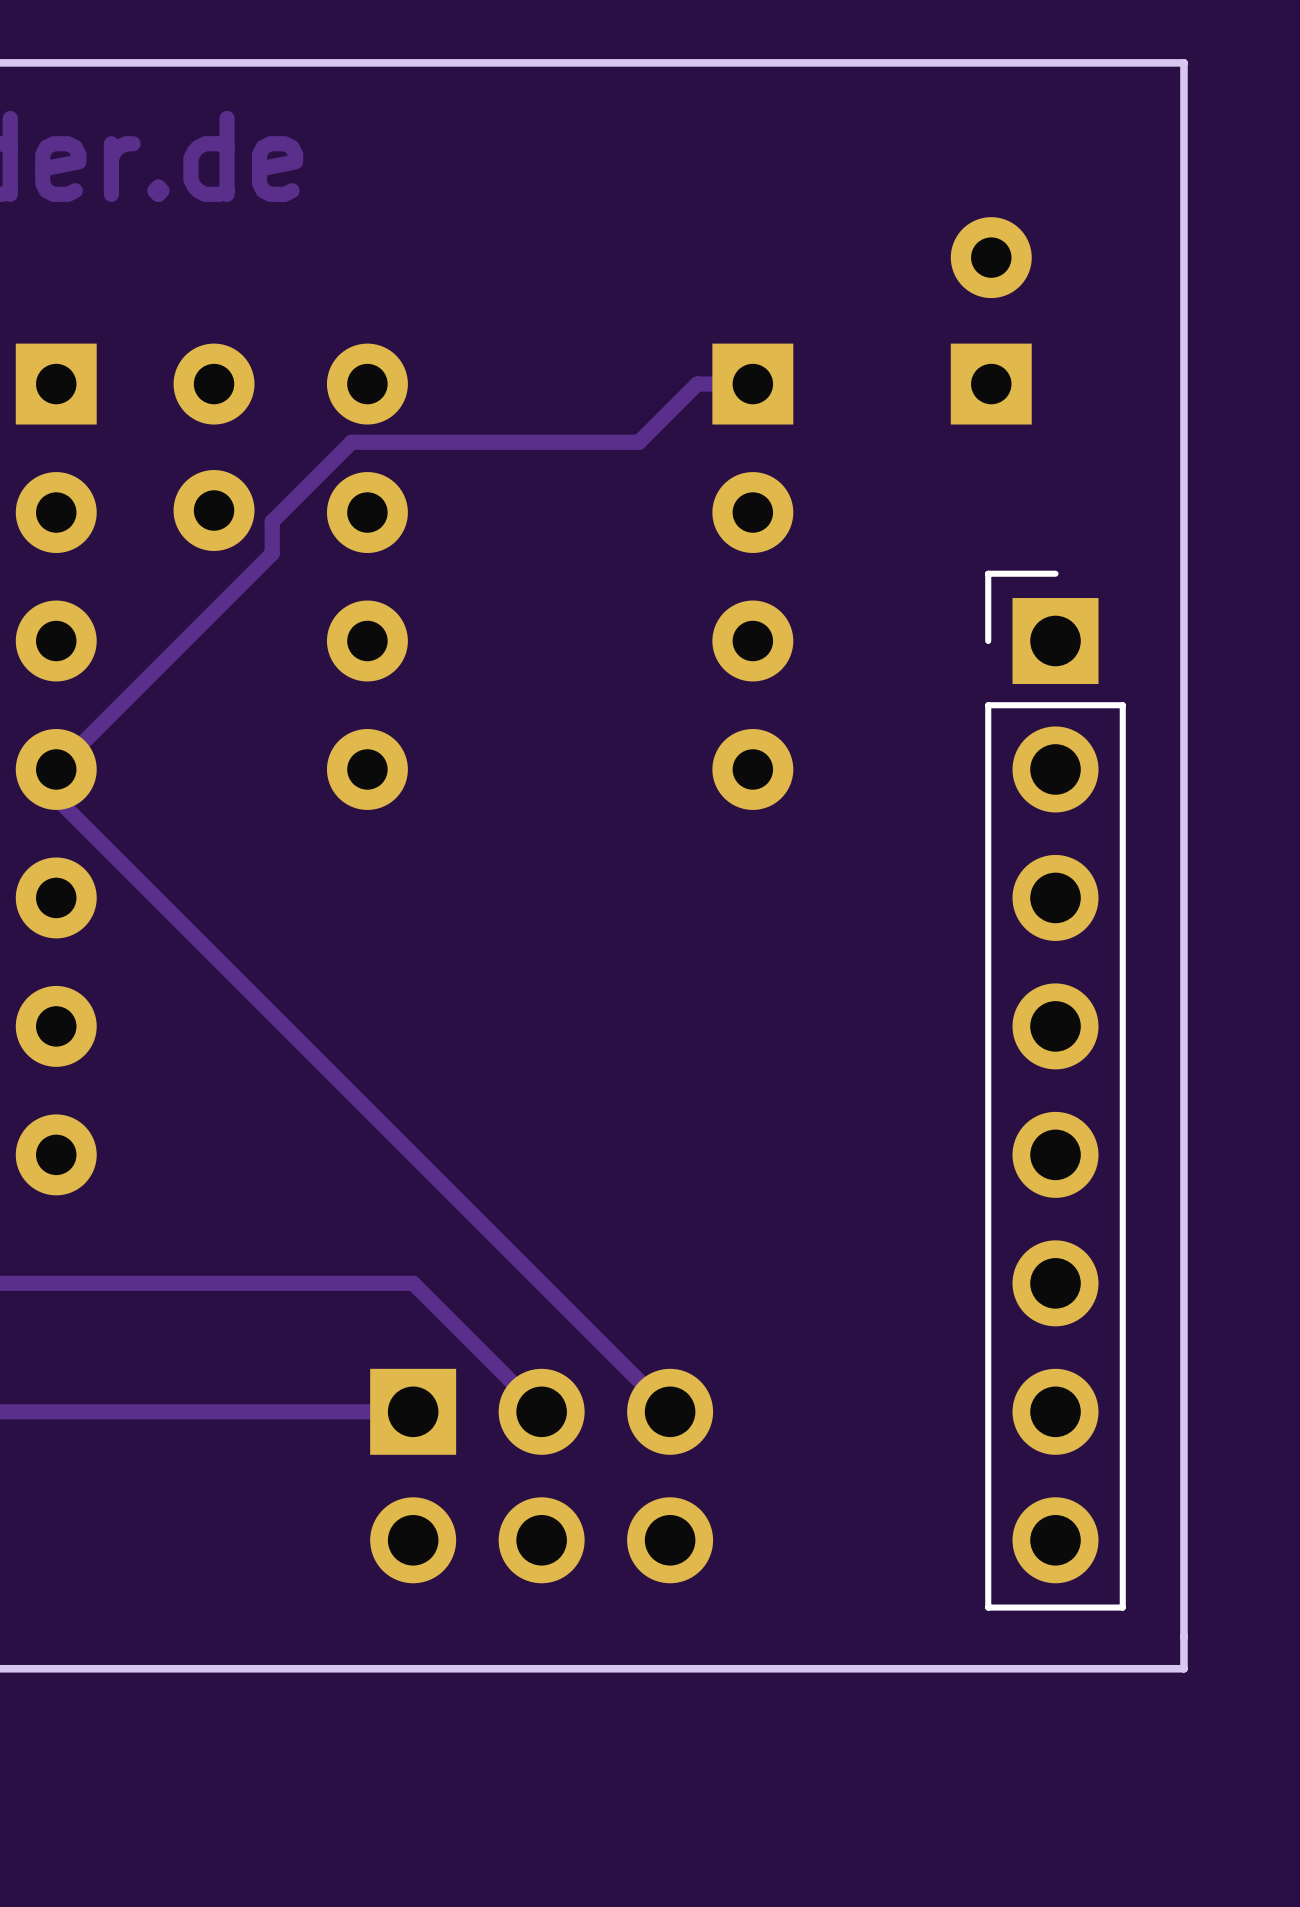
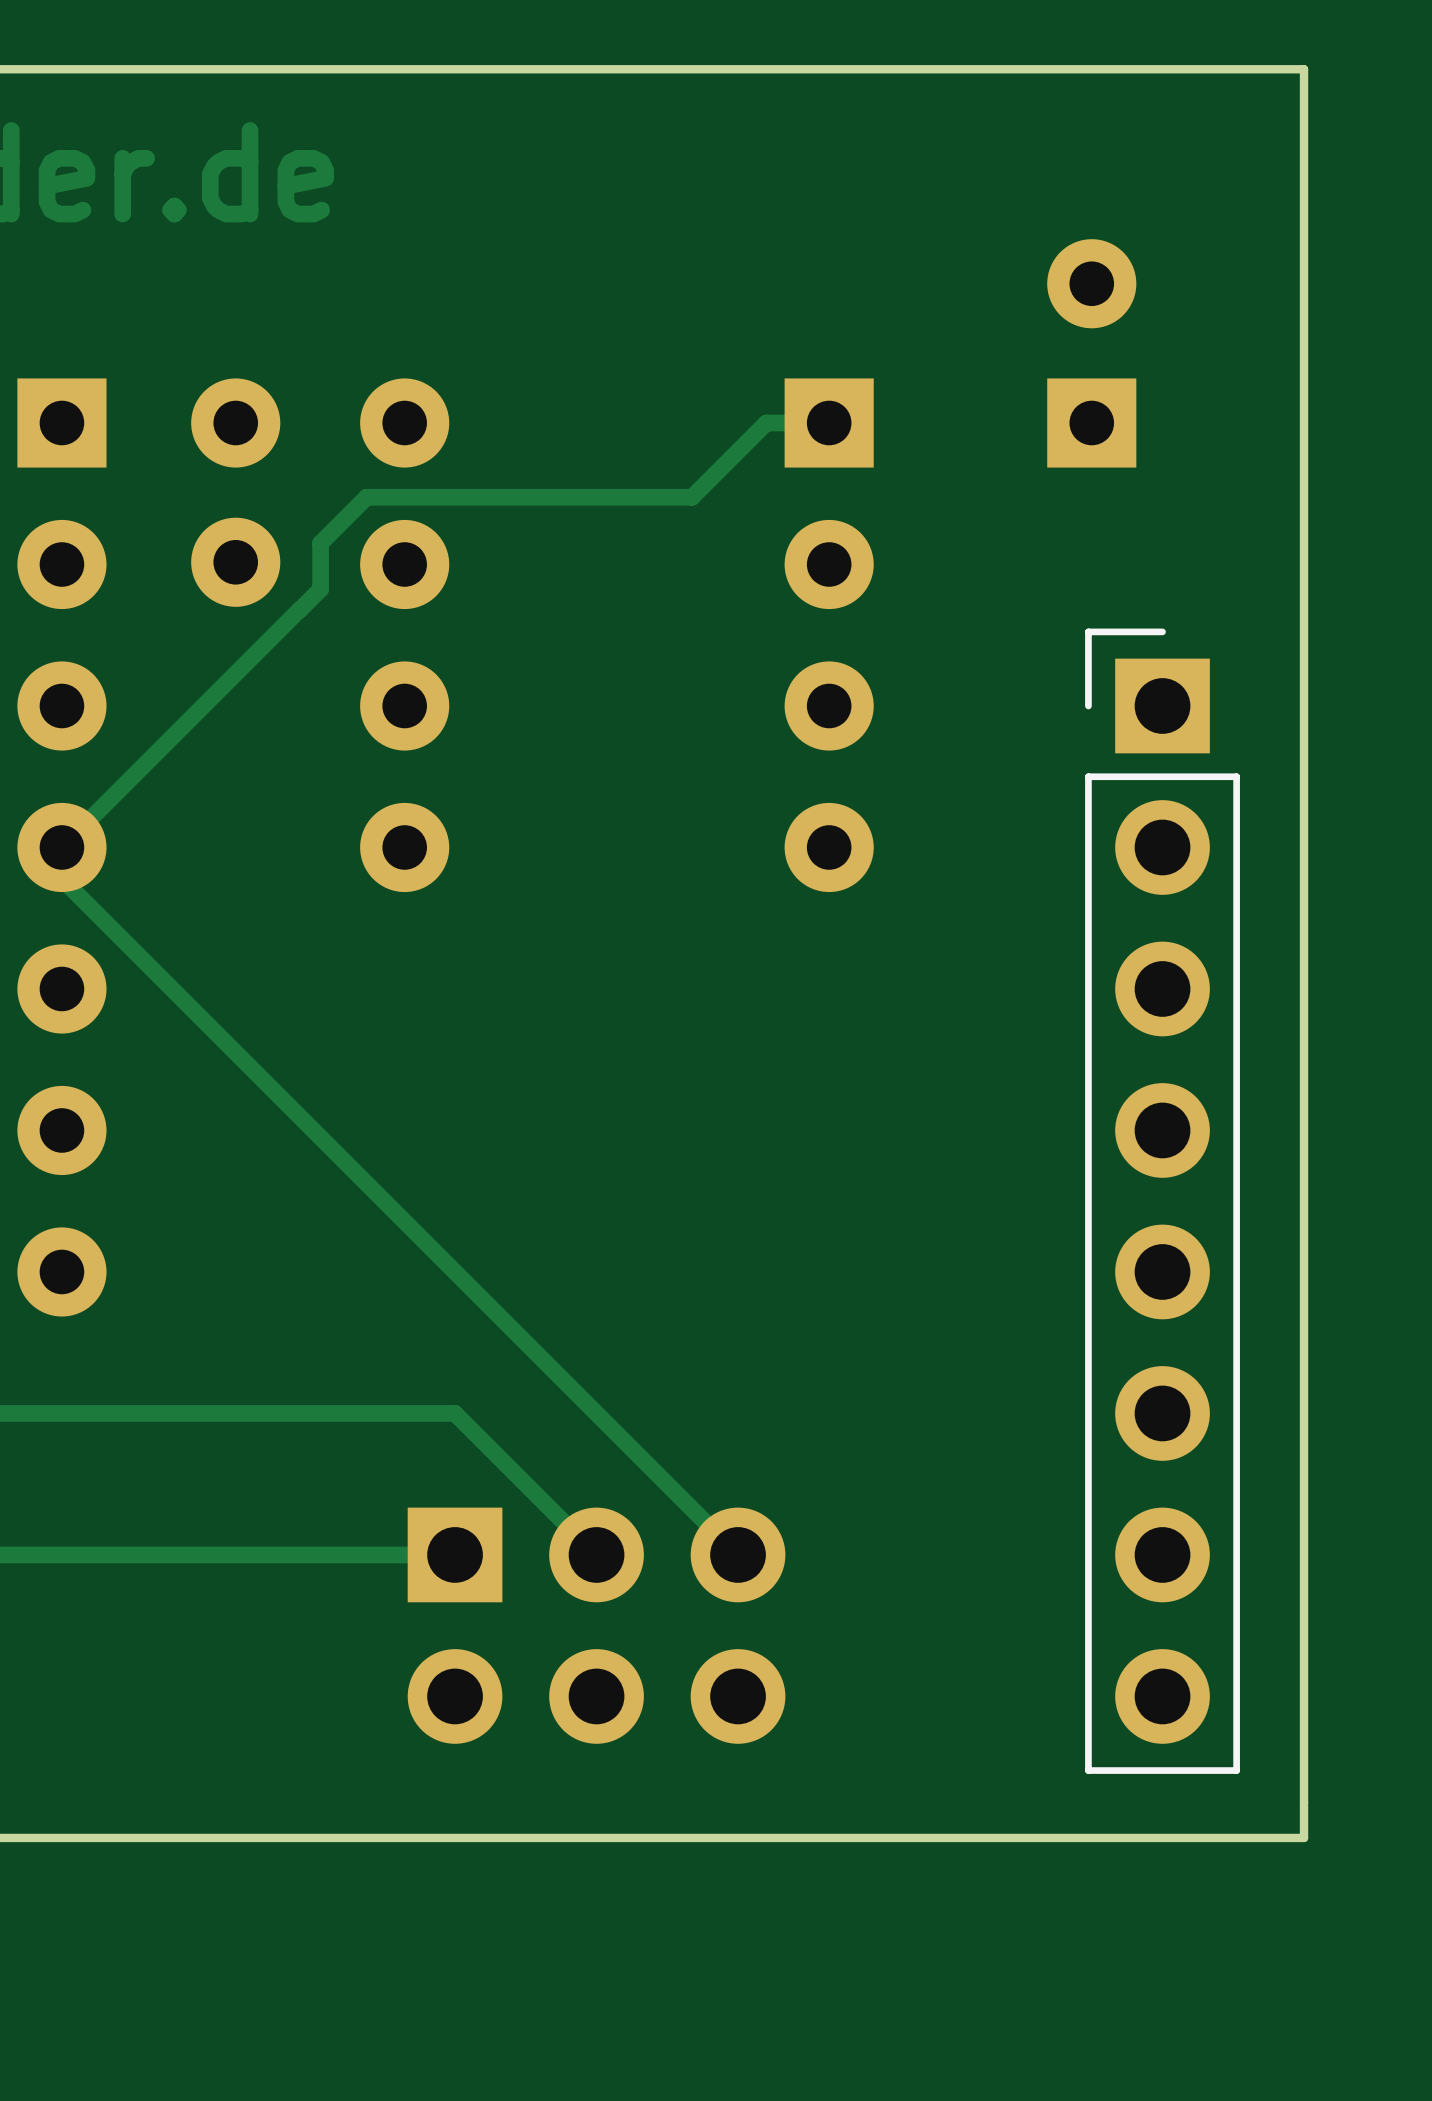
track: (697, 384) (639, 442) (351, 442) (272, 521) (272, 553) -> (767, 423) (692, 497) (366, 497) (320, 543) (320, 589) (300, 609)

